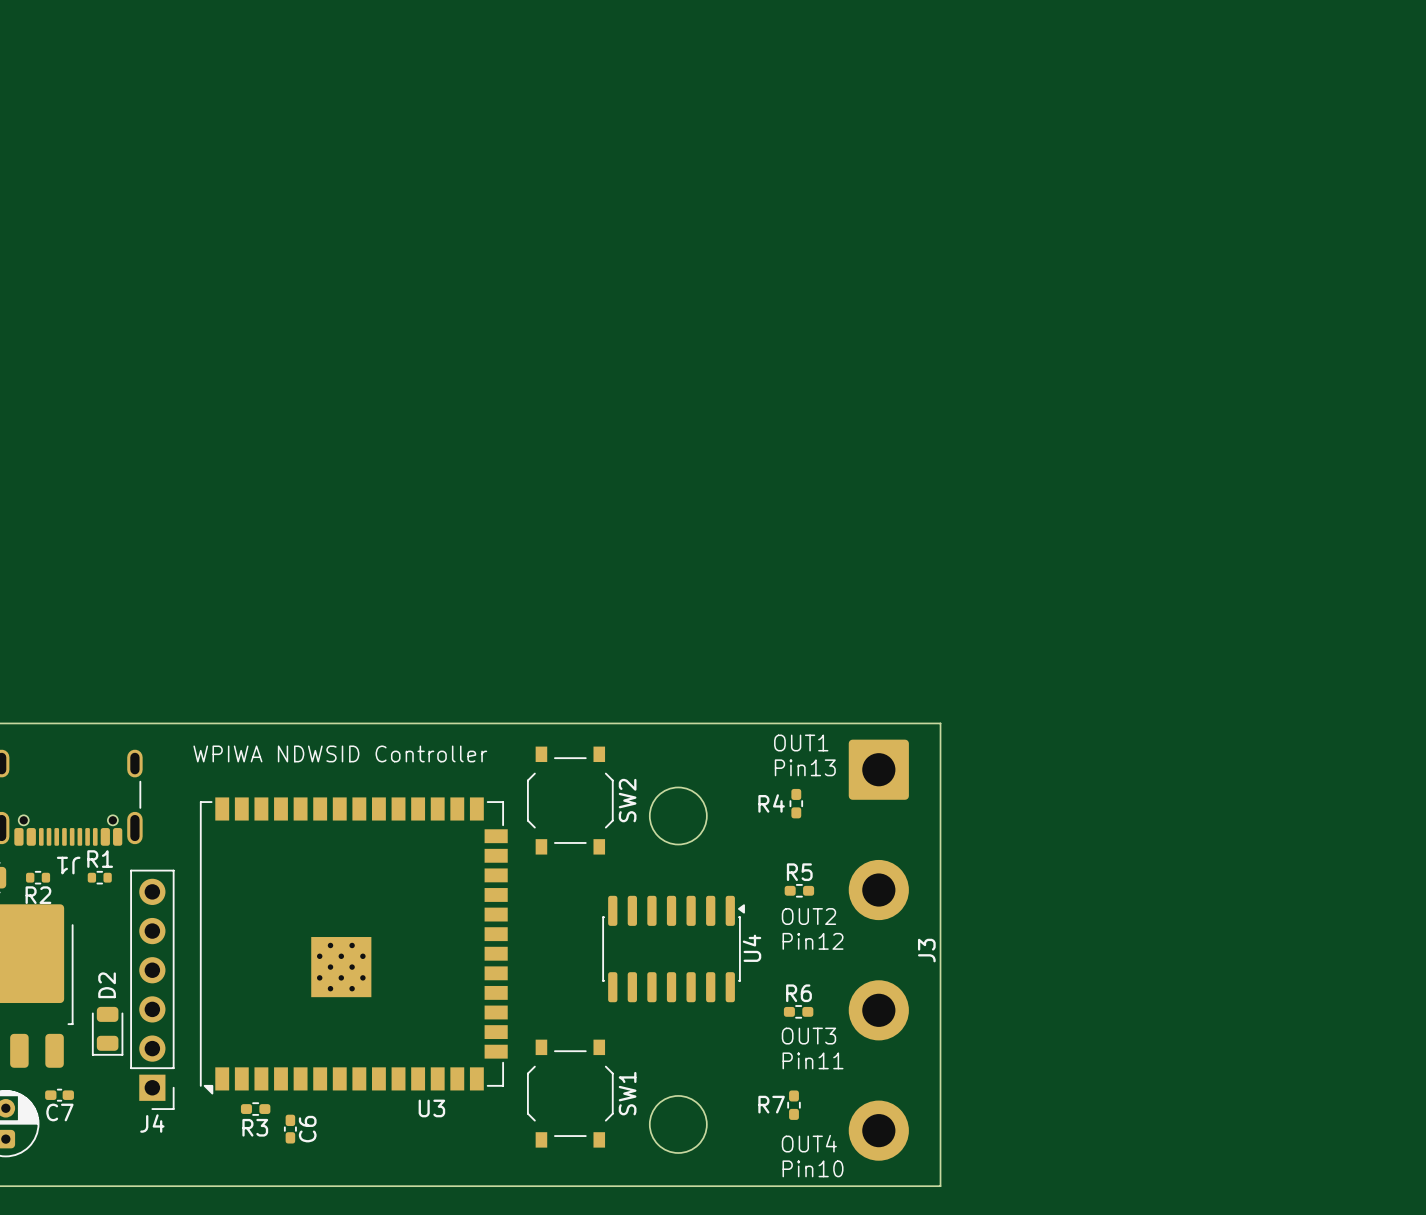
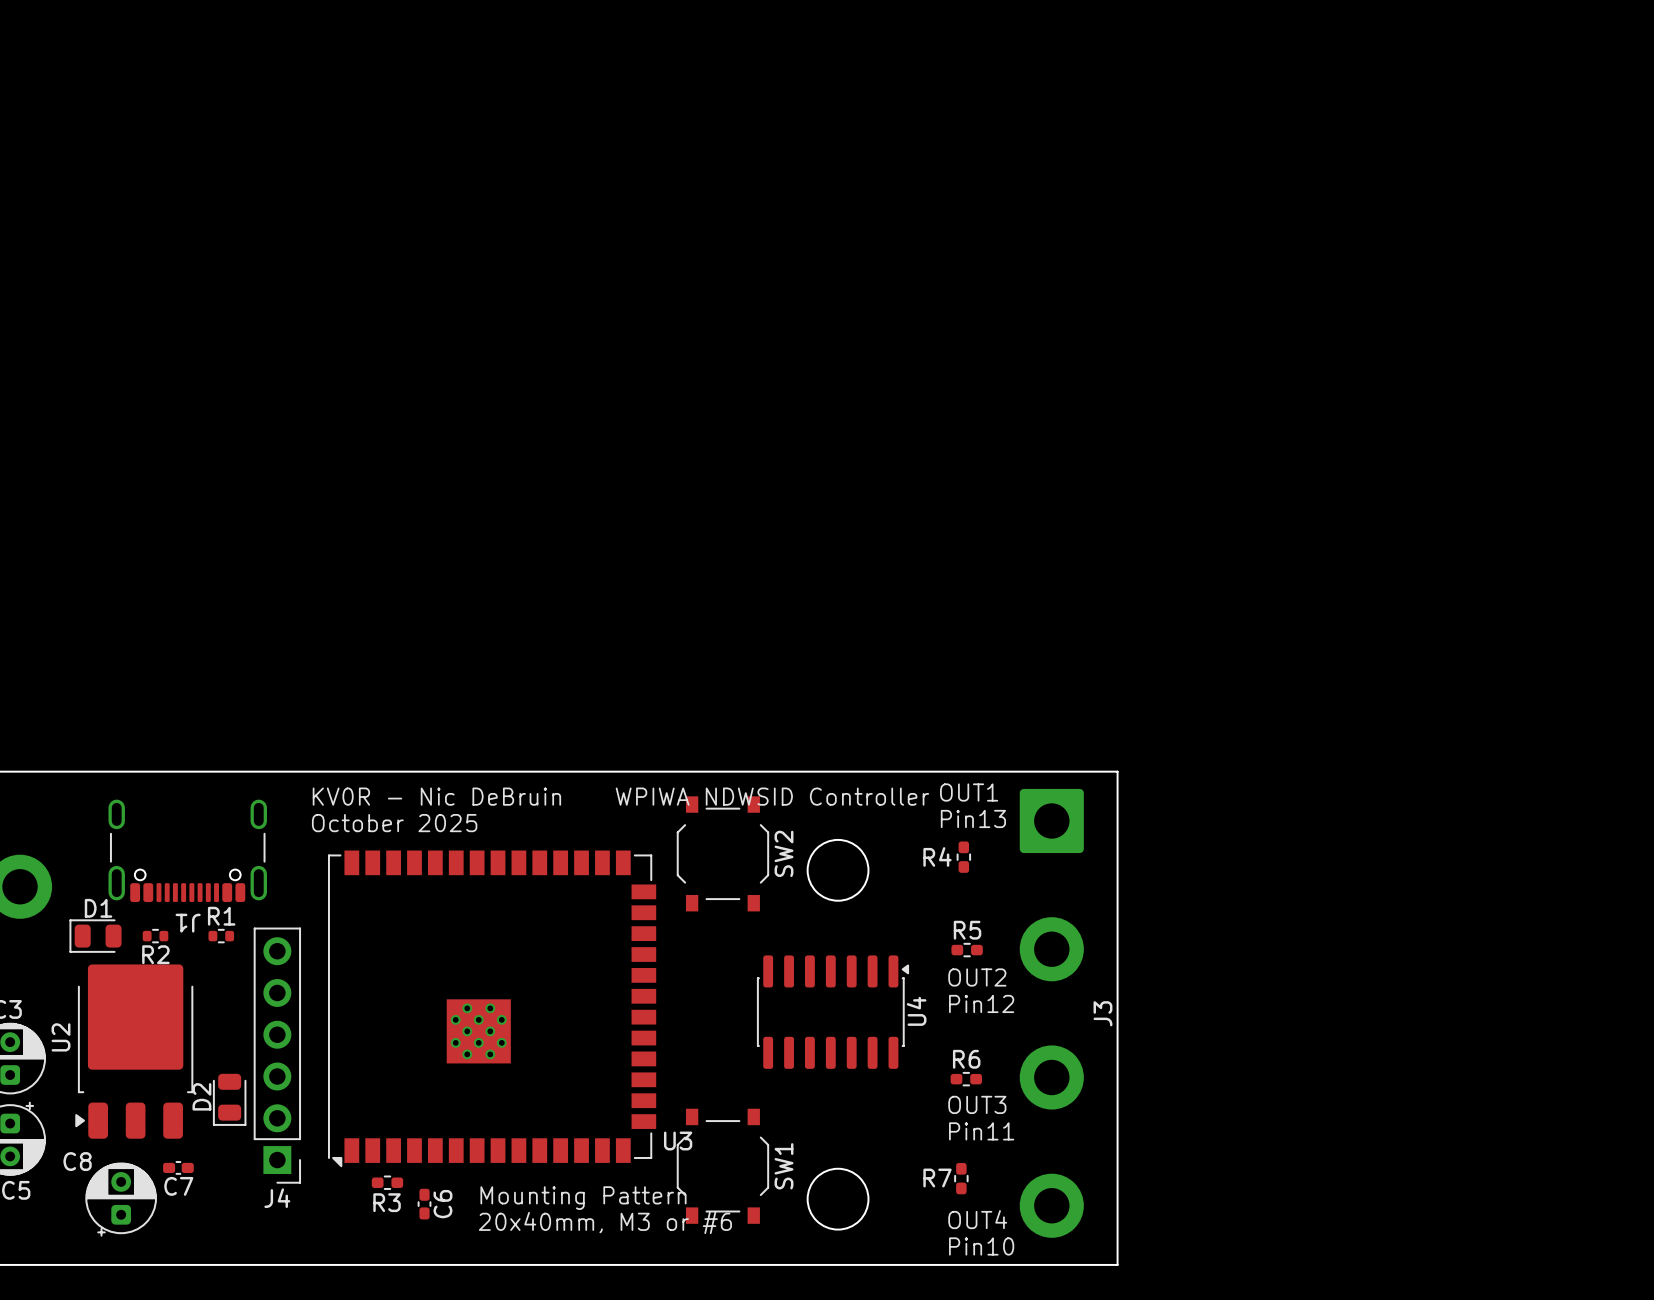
text: WPIWA NDWSID Controller (340, 753) -> KV0R - Nic DeBruin WPIWA NDWSID Controller (620, 796)
text: none -> October 2025 (394, 823)
D2 name position: D2 (107, 985) -> D2 (201, 1096)
U3 name position: U3 (431, 1108) -> U3 (678, 1141)
text: none -> Mounting Pattern (583, 1198)
text: none -> 20x40mm, M3 or #6 (605, 1222)

